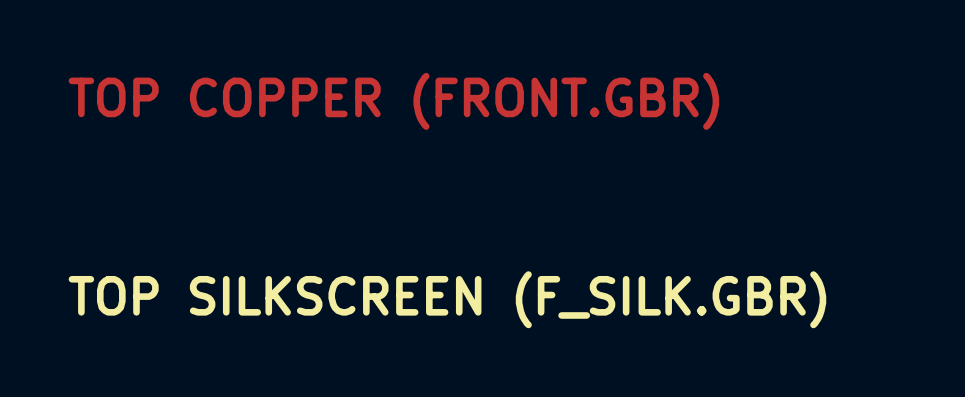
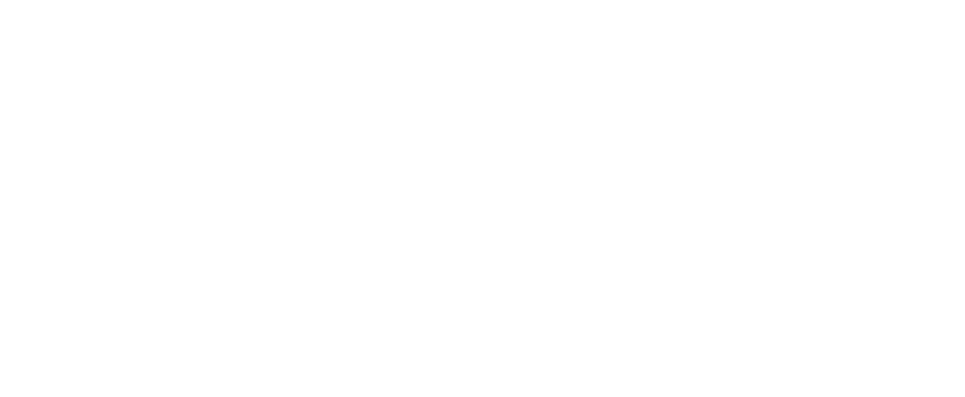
text: TOP COPPER (FRONT.GBR) (393, 101) -> none
text: TOP SILKSCREEN (F_SILK.GBR) (447, 299) -> none

